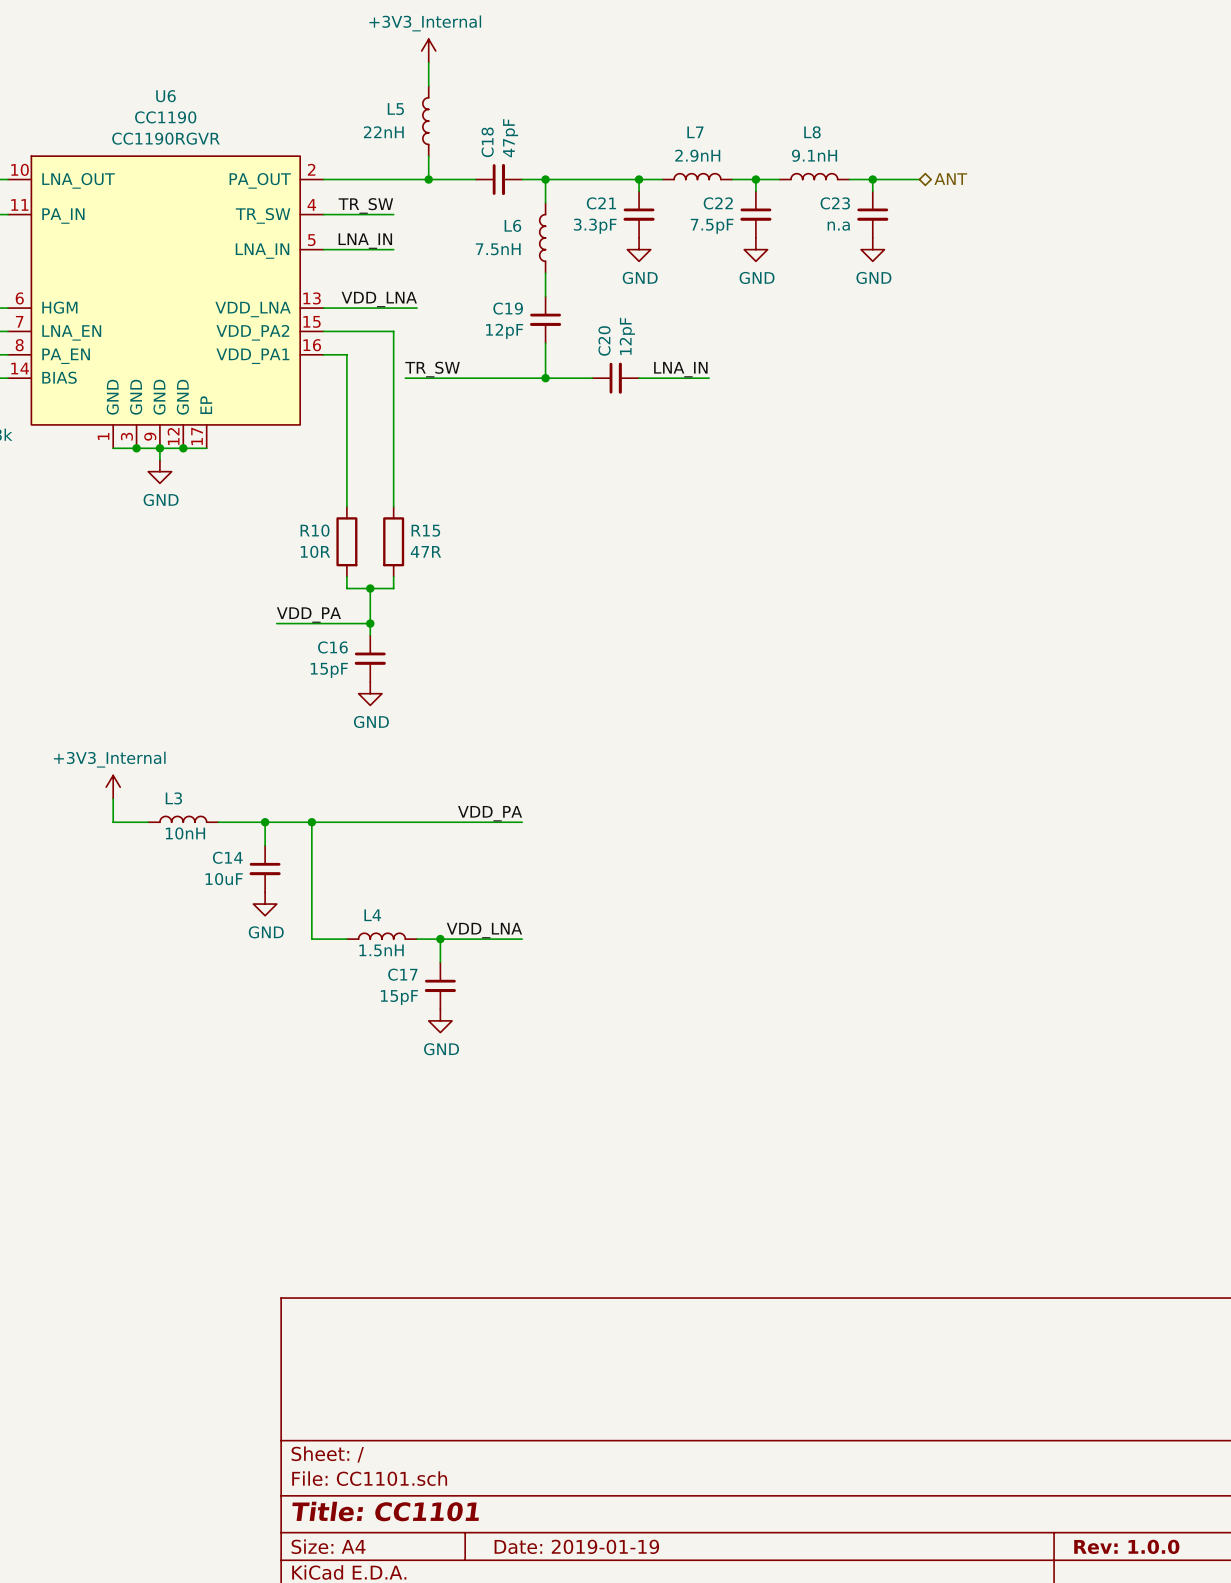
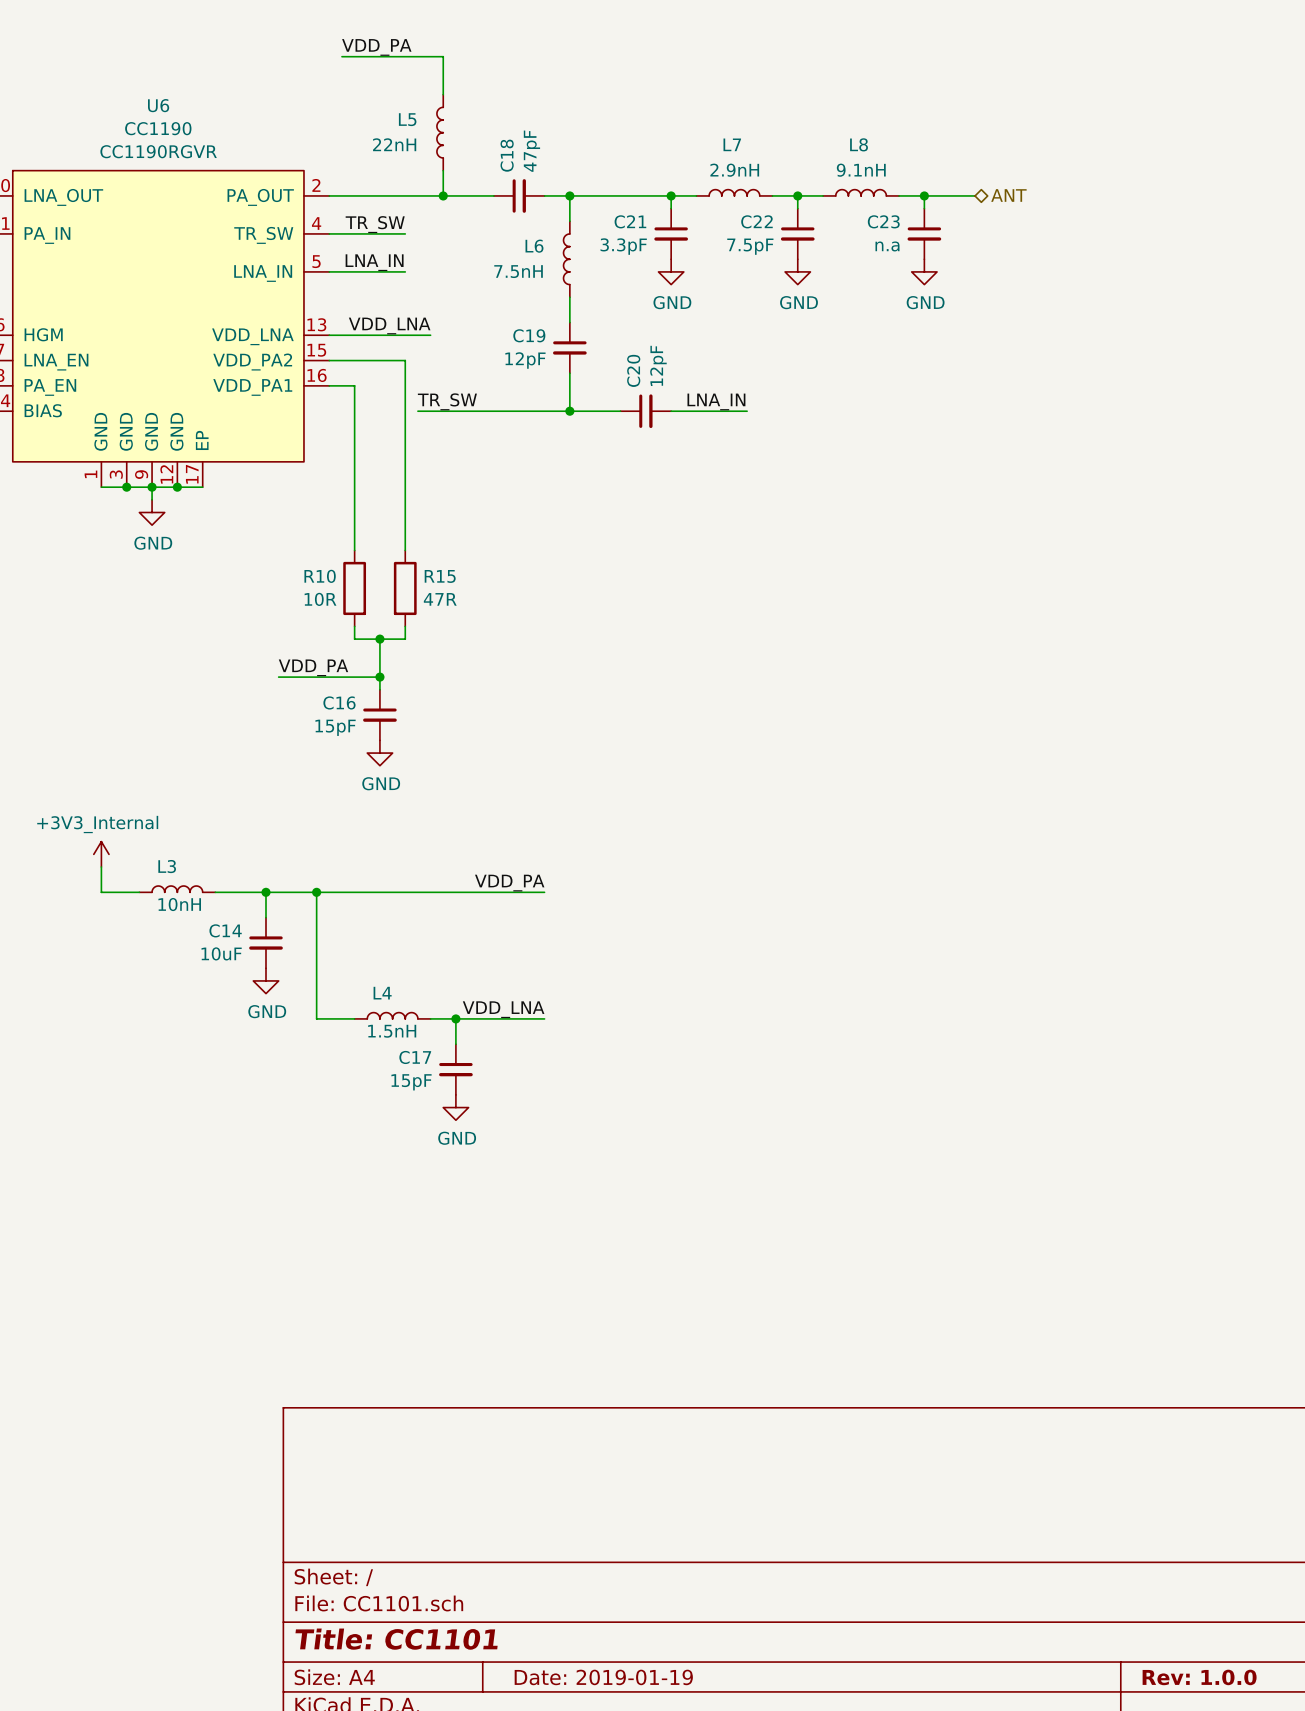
label: none -> VDD_PA (376, 47)
wire: none -> (341, 56) (443, 56) (443, 69)
power symbol: +3V3_Internal (428, 50) -> none

